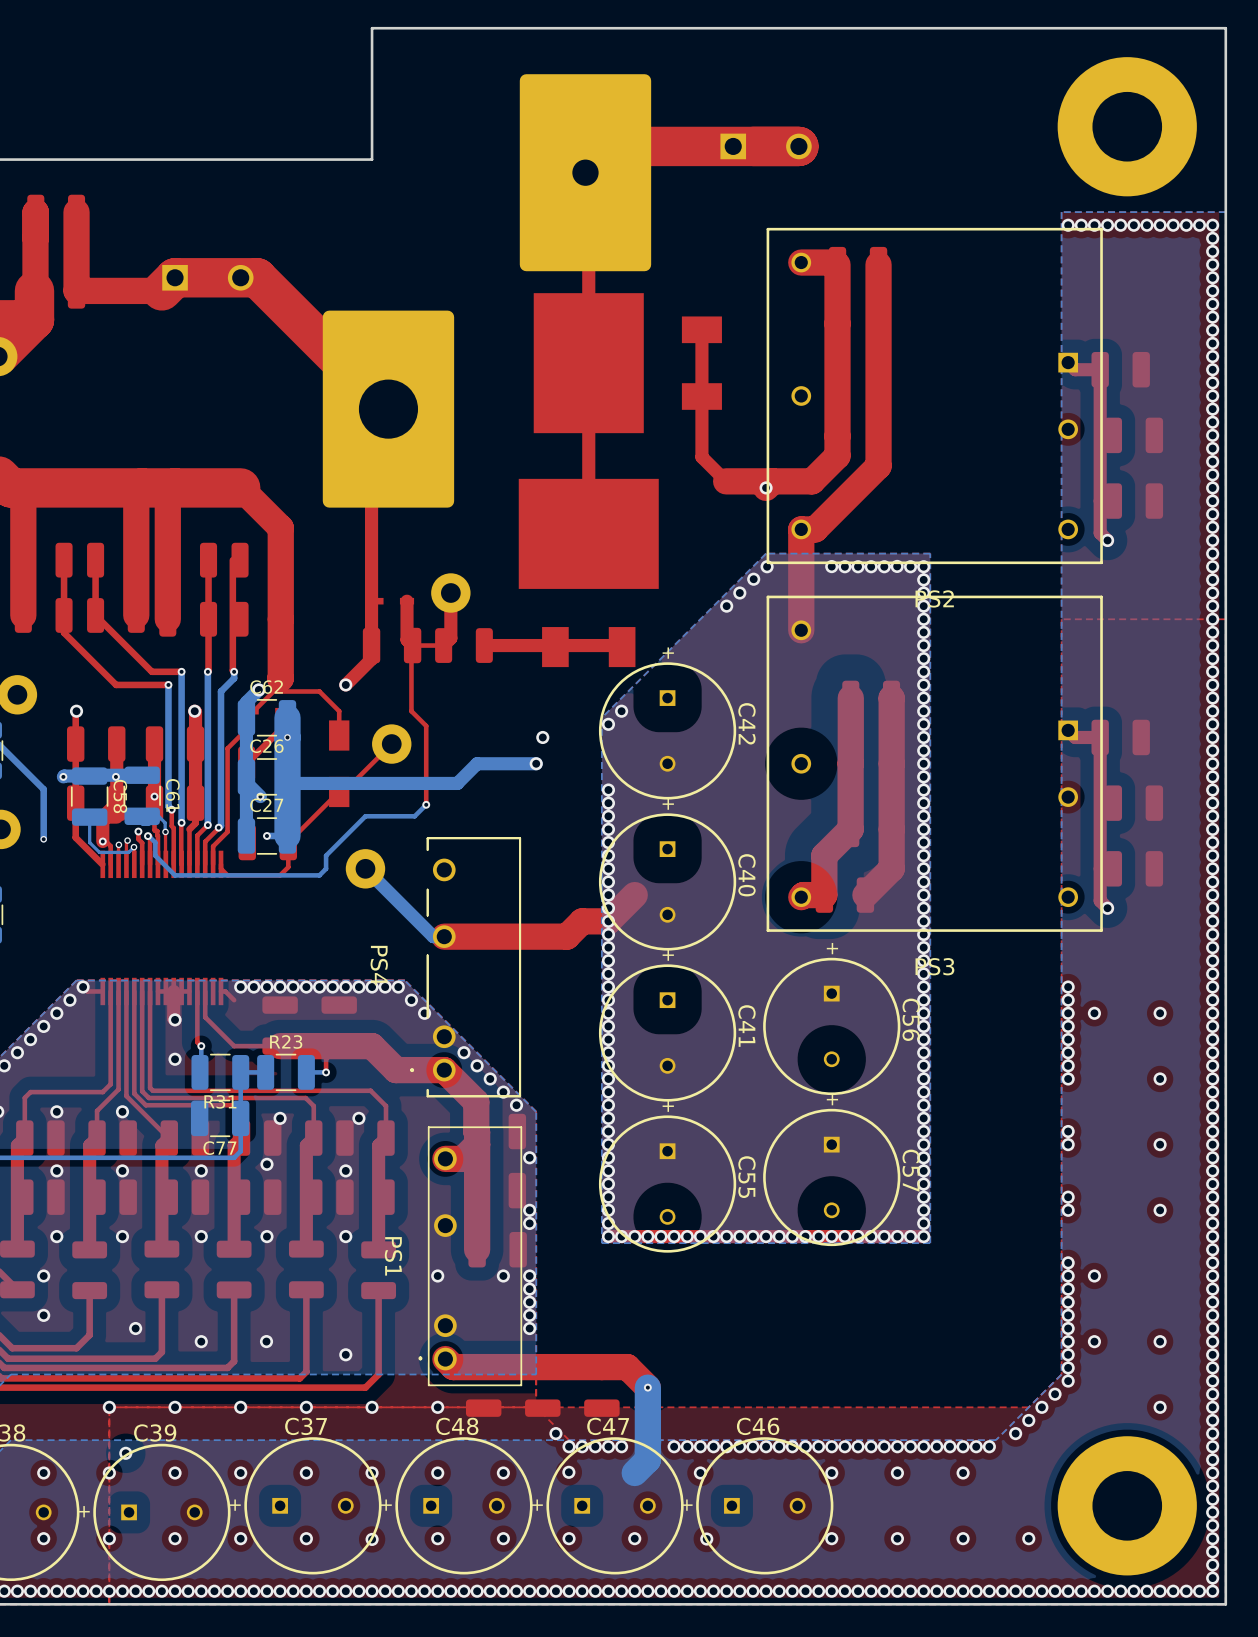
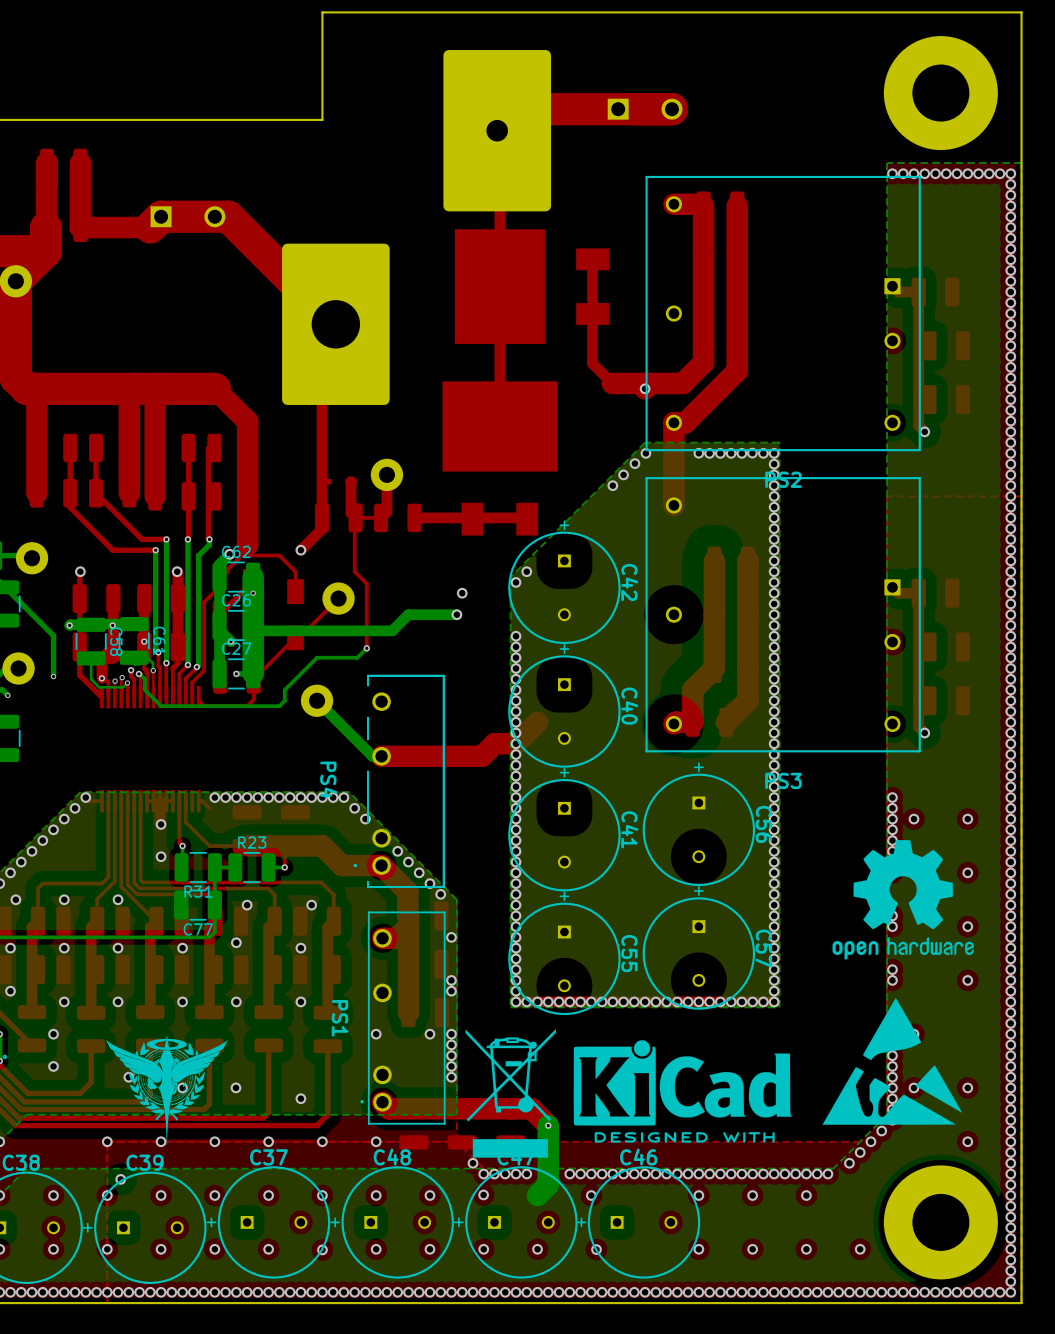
drawing: none -> [832, 840, 974, 960]
drawing: none -> [822, 998, 963, 1125]
drawing: none -> [465, 1028, 556, 1158]
drawing: none -> [106, 1035, 228, 1146]
drawing: none -> [573, 1040, 792, 1143]

